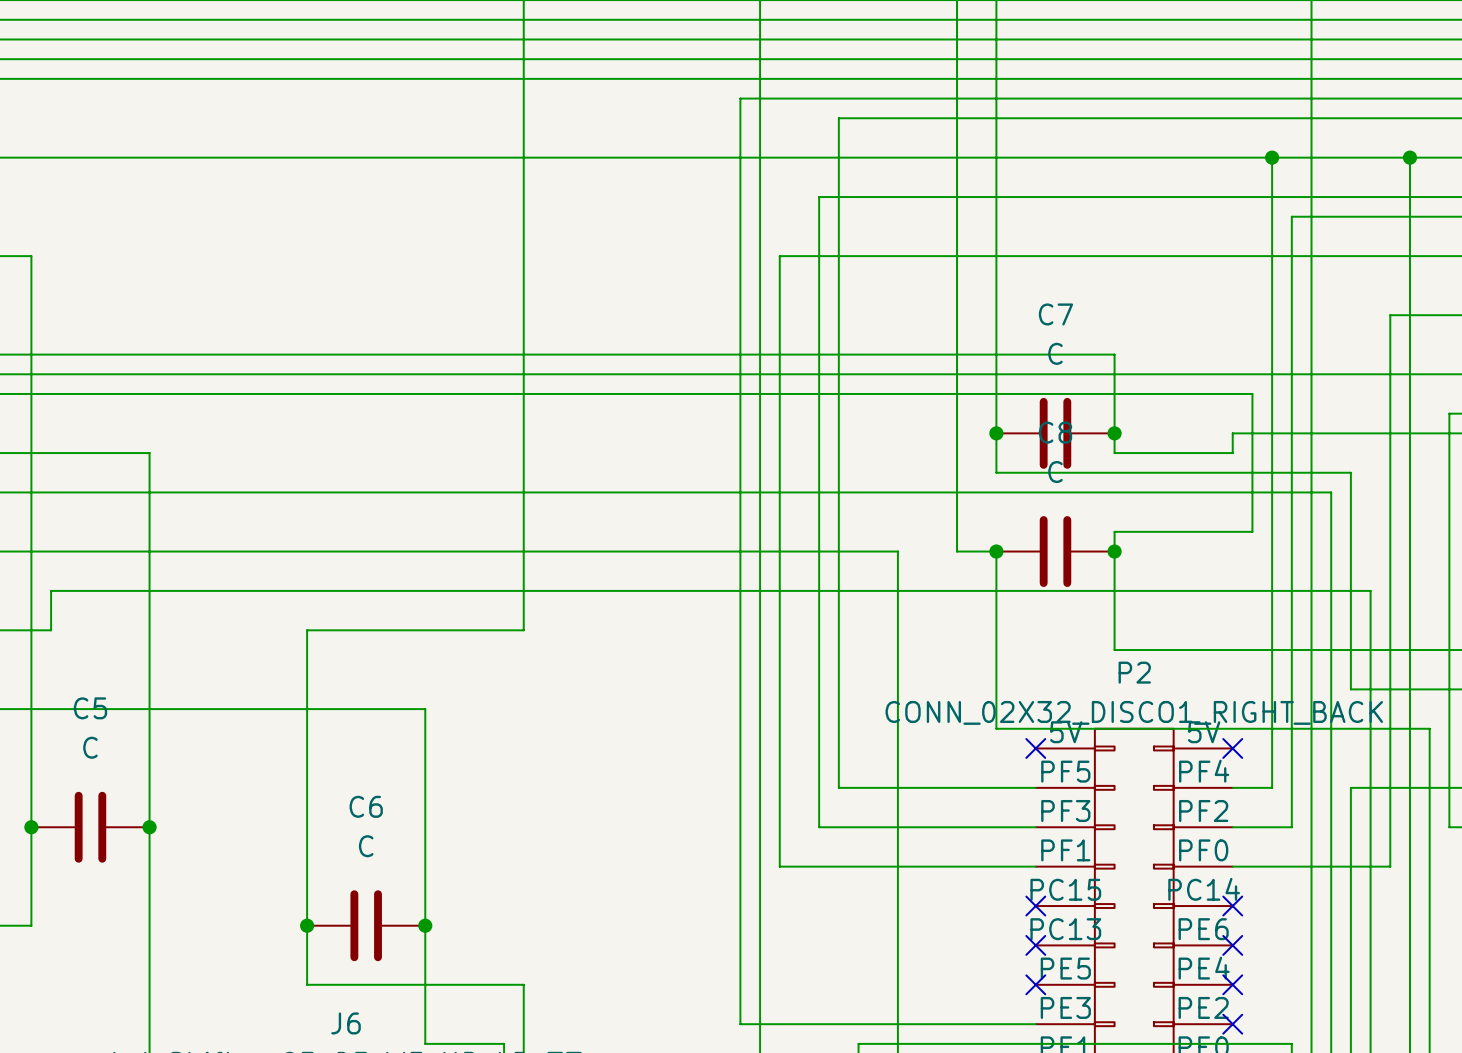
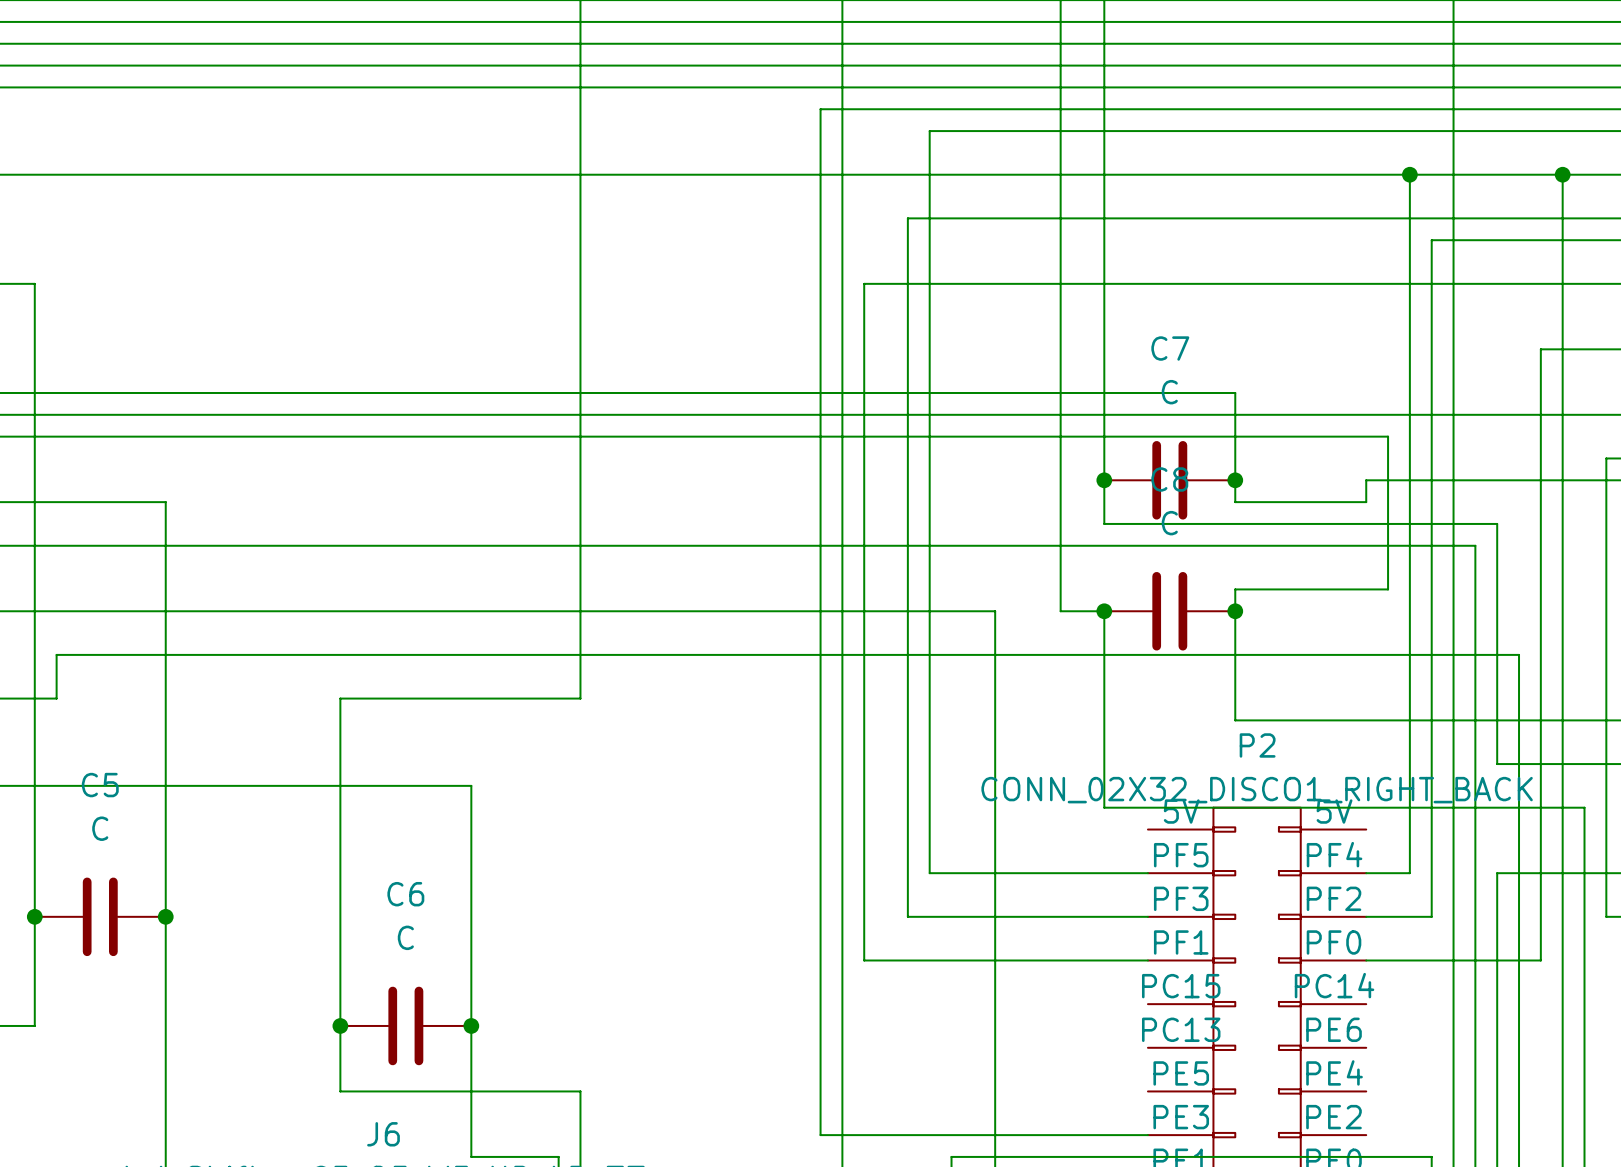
no-connect mark: (1035, 748) -> none
no-connect mark: (1232, 748) -> none
no-connect mark: (1035, 906) -> none
no-connect mark: (1232, 906) -> none
no-connect mark: (1035, 945) -> none
no-connect mark: (1232, 945) -> none
no-connect mark: (1035, 984) -> none
no-connect mark: (1232, 984) -> none
no-connect mark: (1232, 1024) -> none

